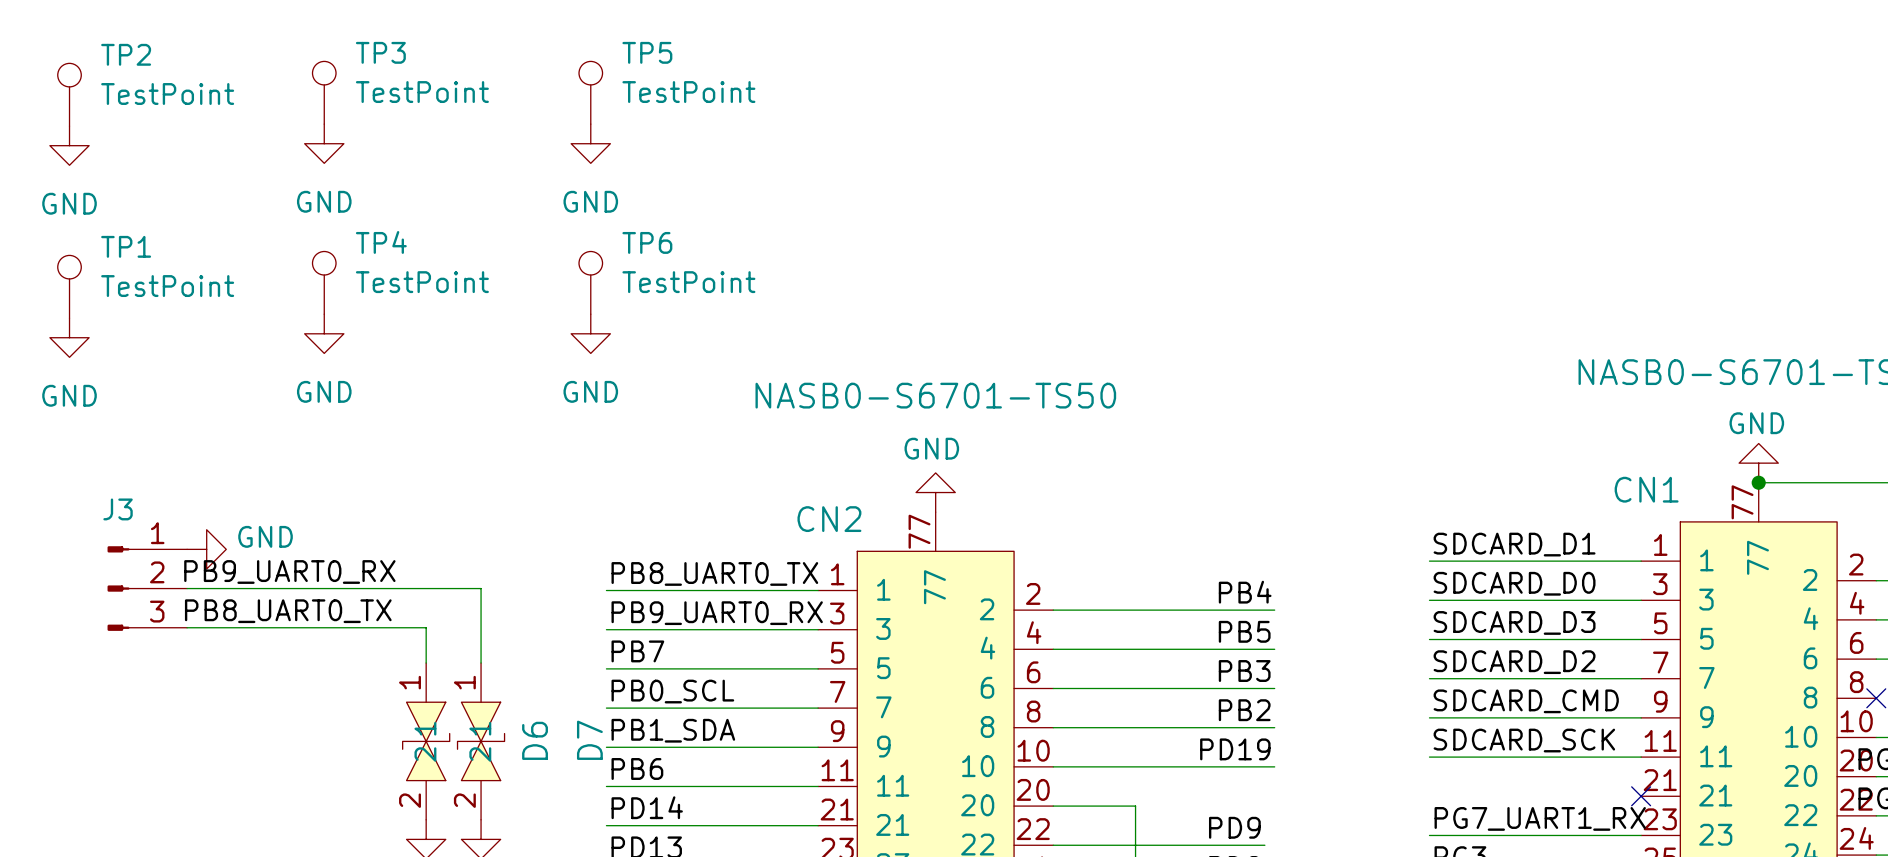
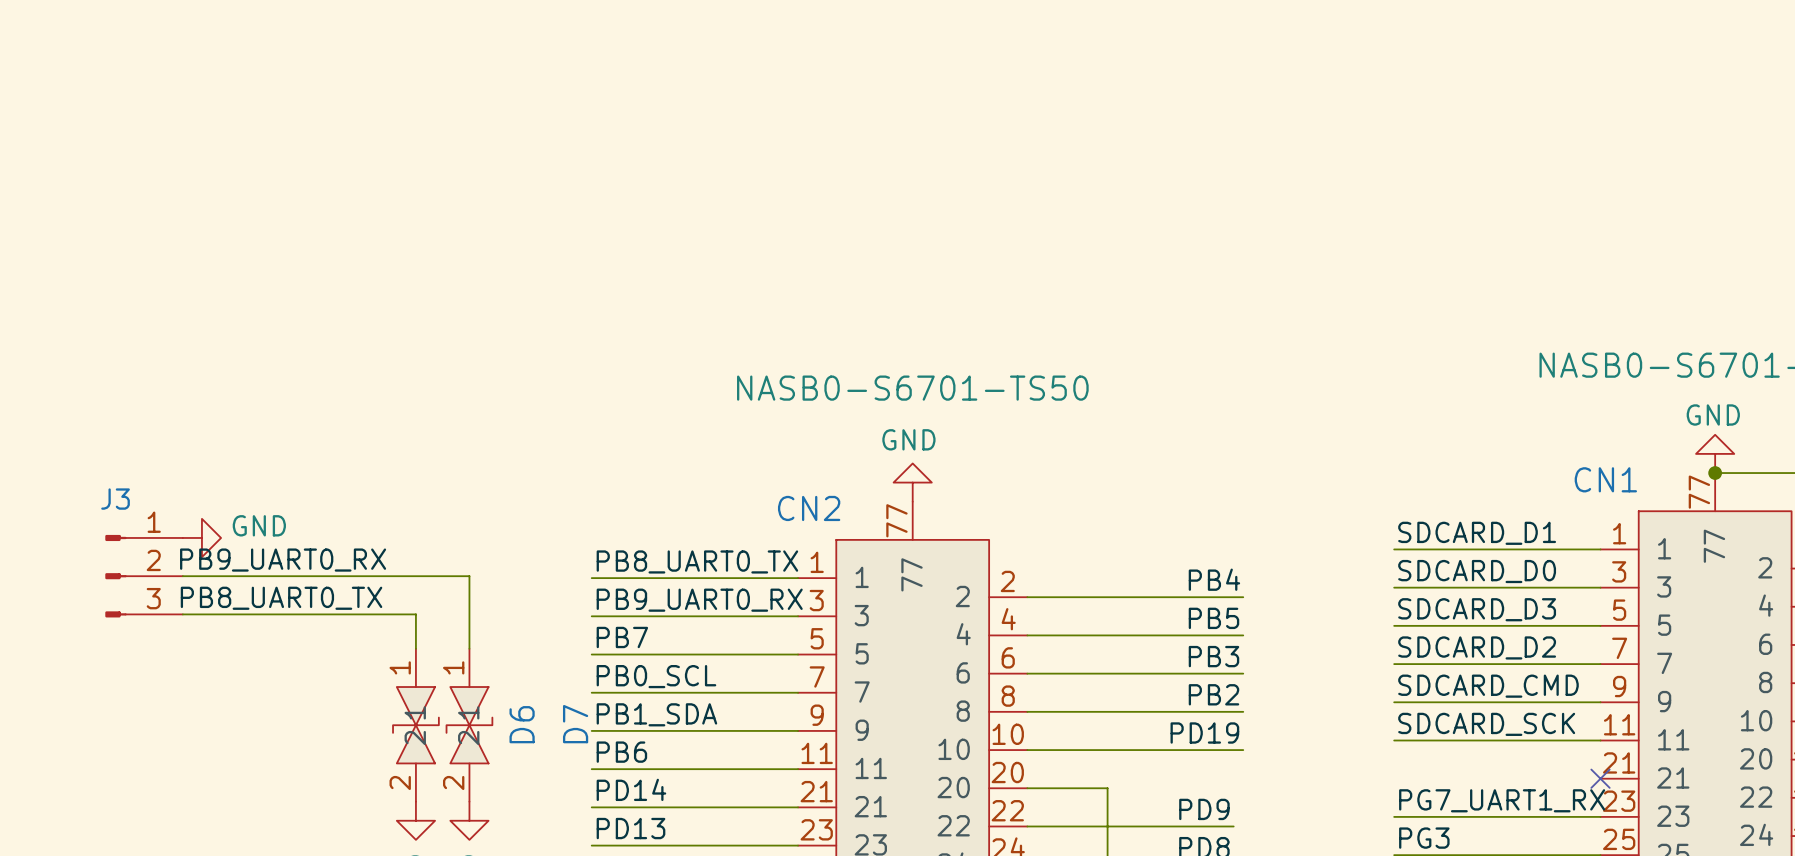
TP3: TestPoint (324, 92) -> none
TP5: TestPoint (590, 92) -> none
TP2: TestPoint (69, 94) -> none
power symbol: GND (324, 143) -> none
power symbol: GND (590, 143) -> none
power symbol: GND (69, 145) -> none
TP4: TestPoint (324, 282) -> none
TP6: TestPoint (590, 282) -> none
TP1: TestPoint (69, 286) -> none
power symbol: GND (324, 333) -> none
power symbol: GND (590, 333) -> none
power symbol: GND (69, 337) -> none

